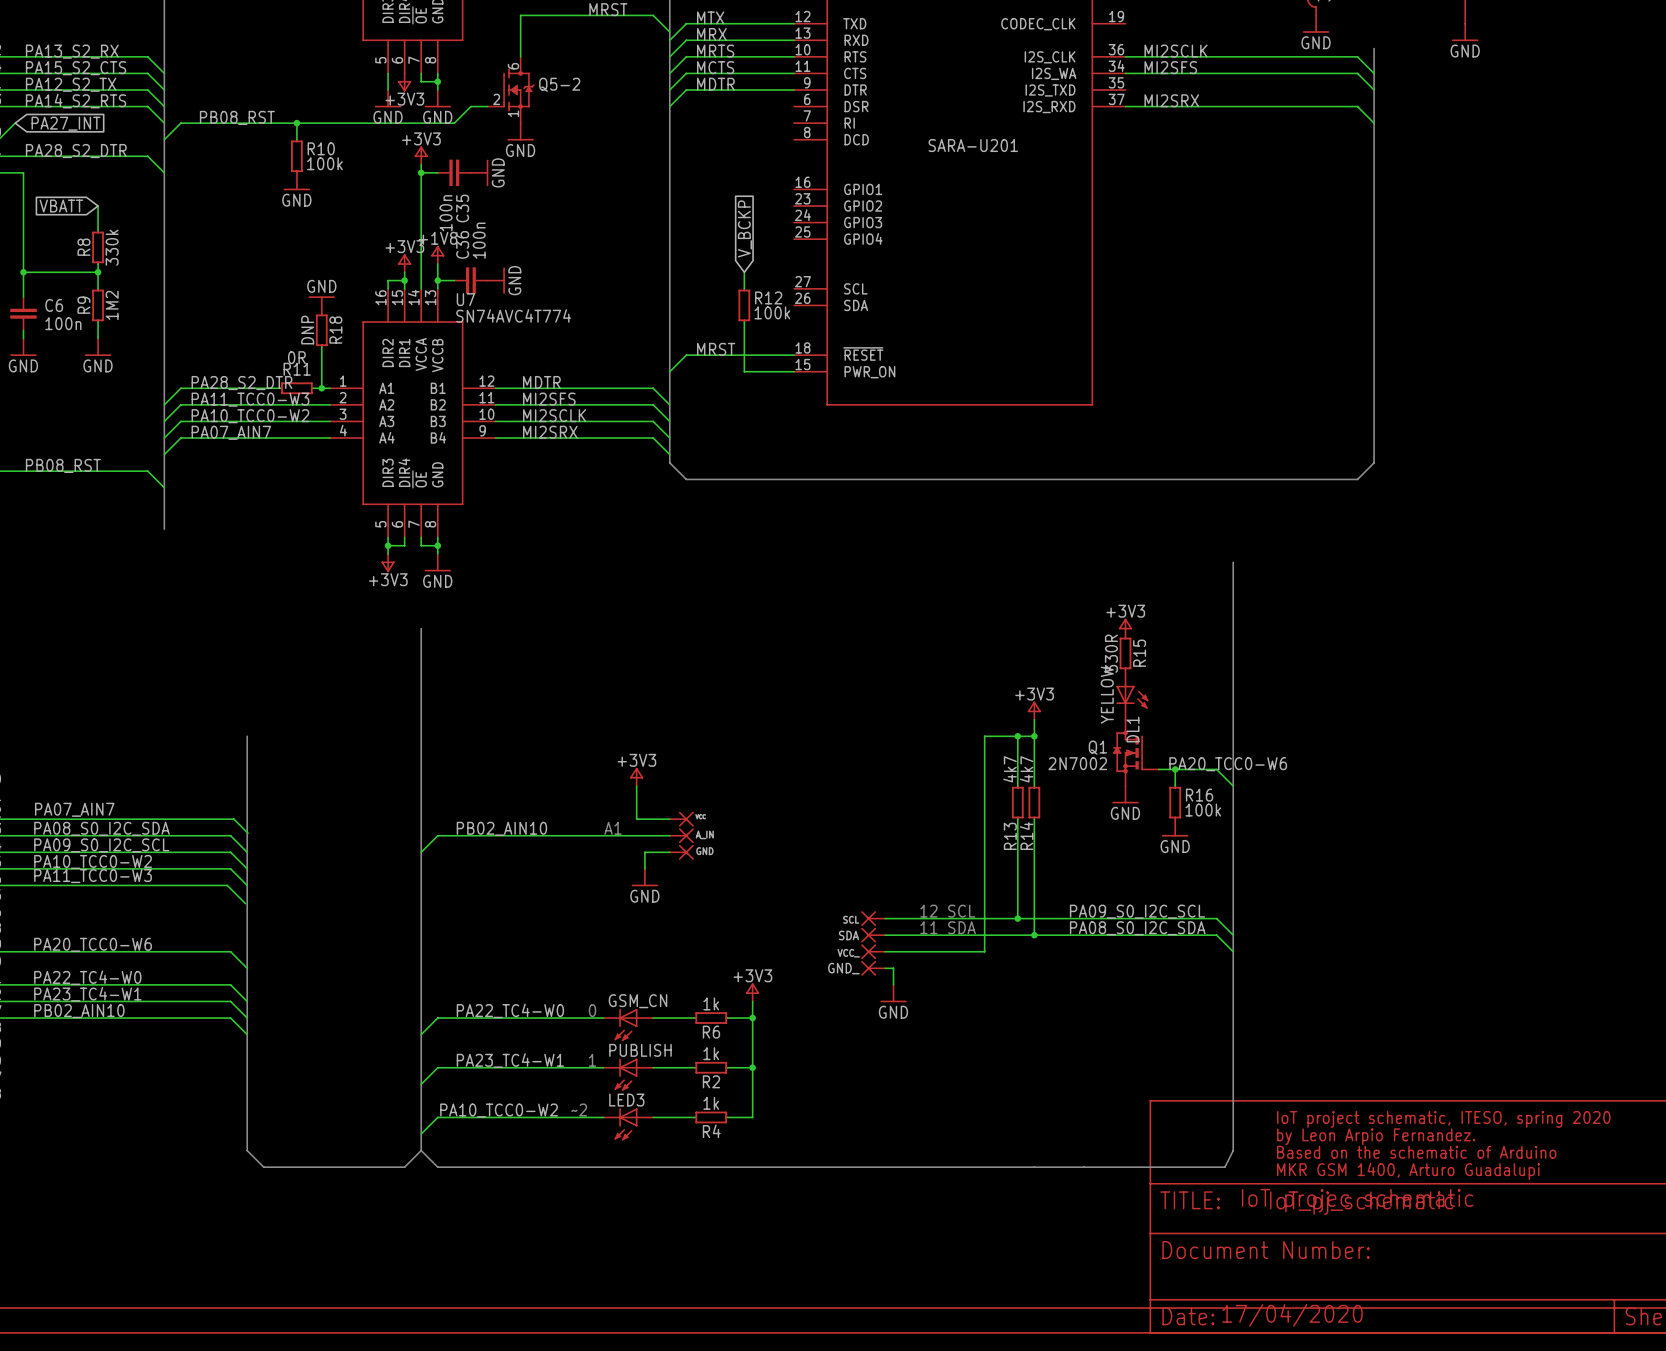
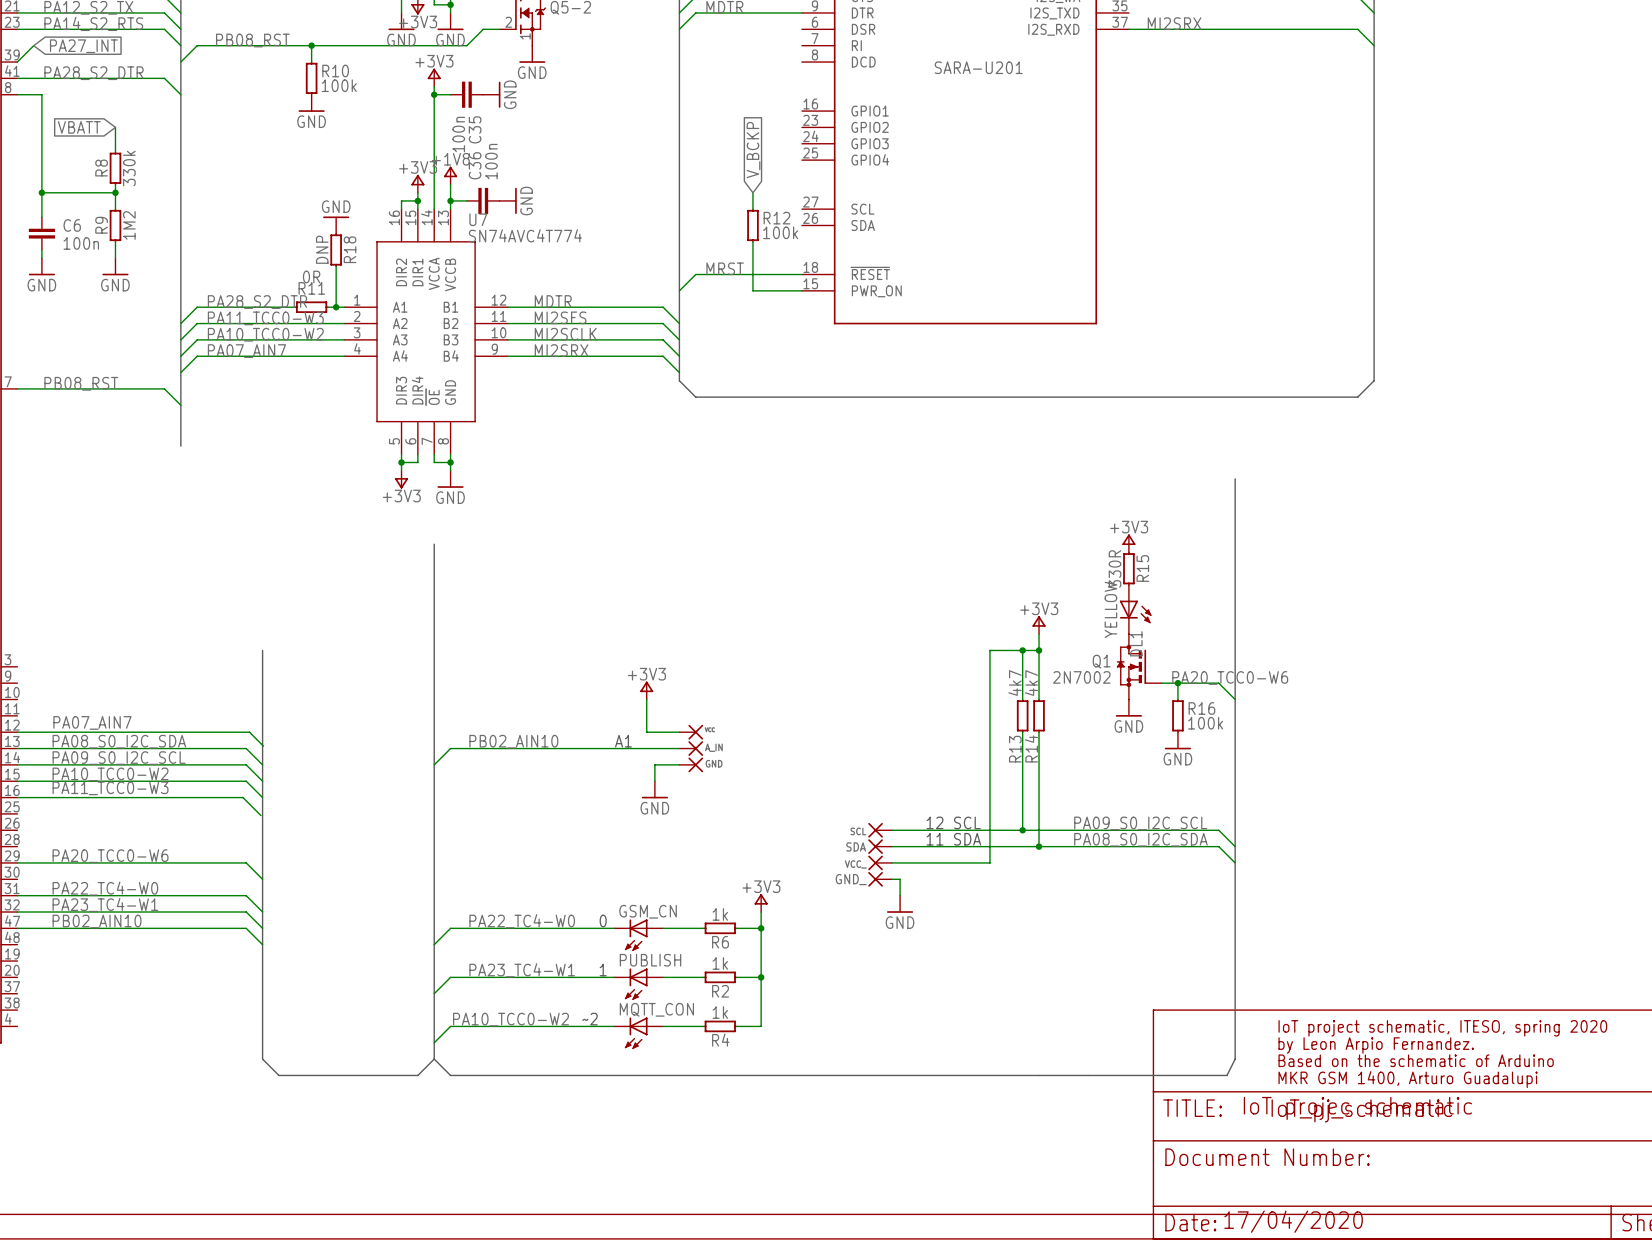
LED3 name: LED3 (626, 1100) -> MQTT_CON (656, 1009)

